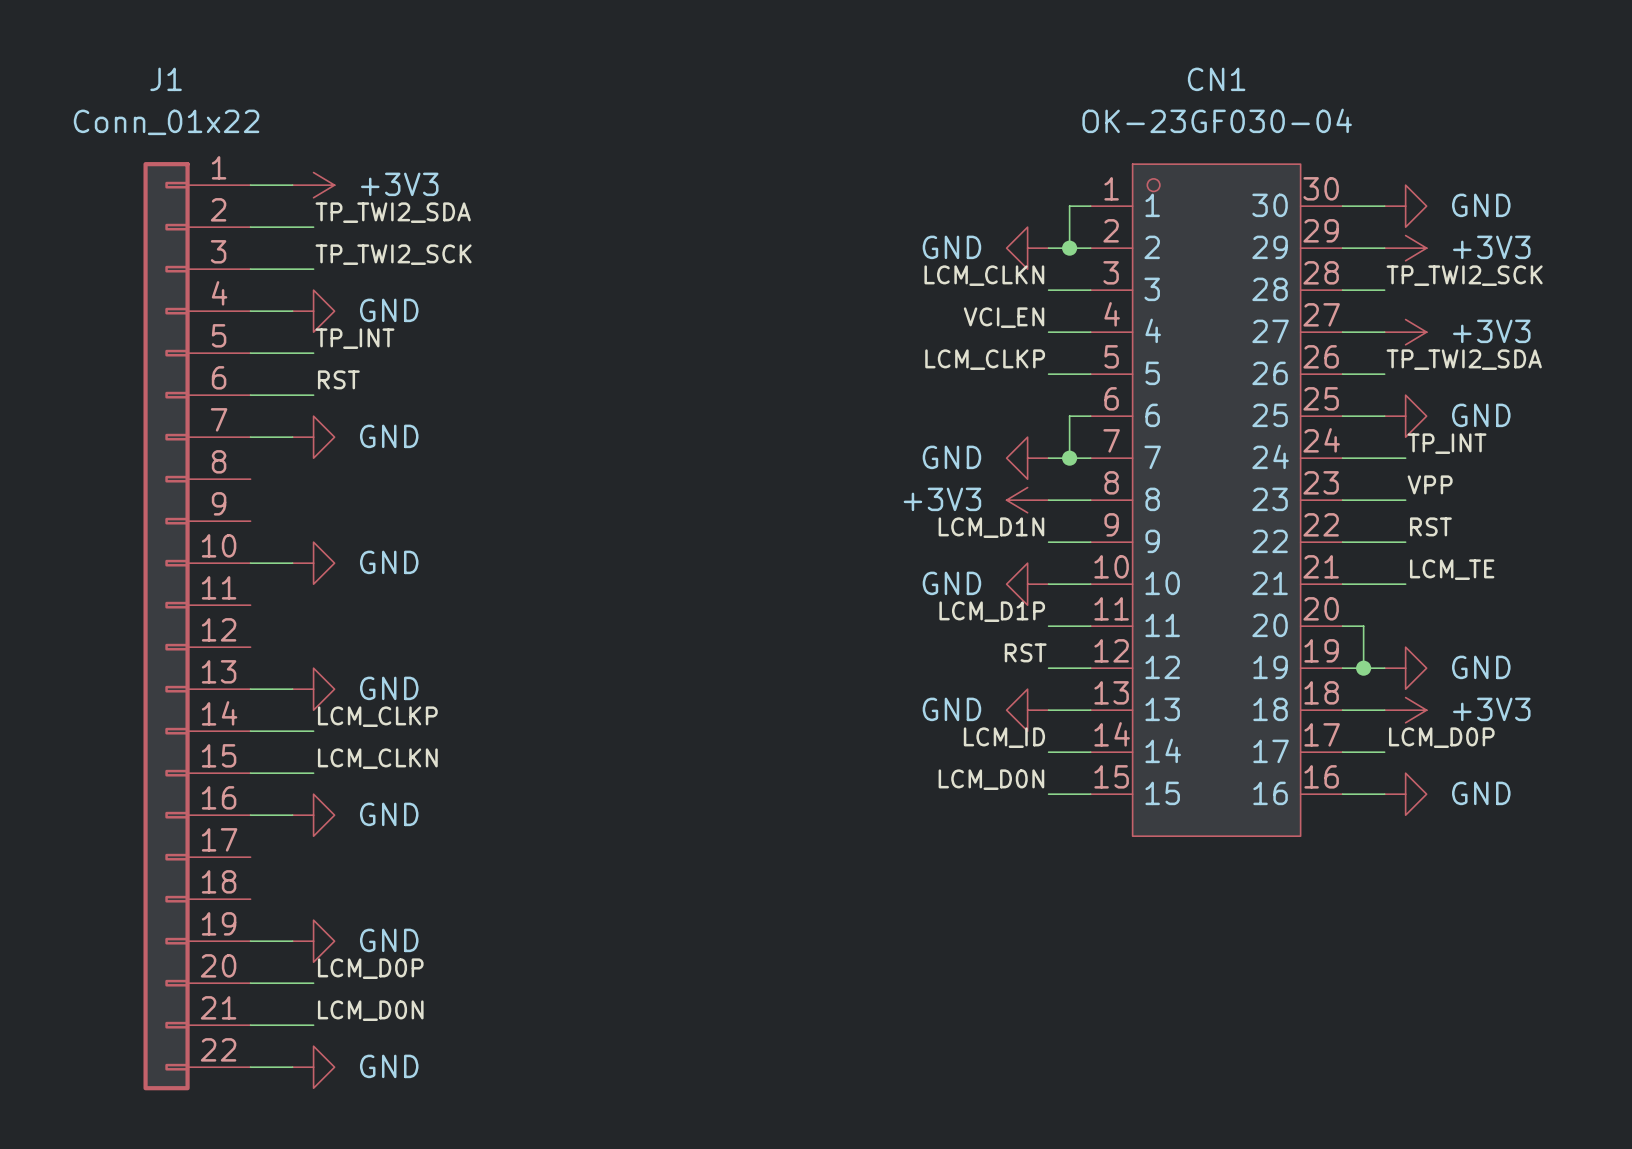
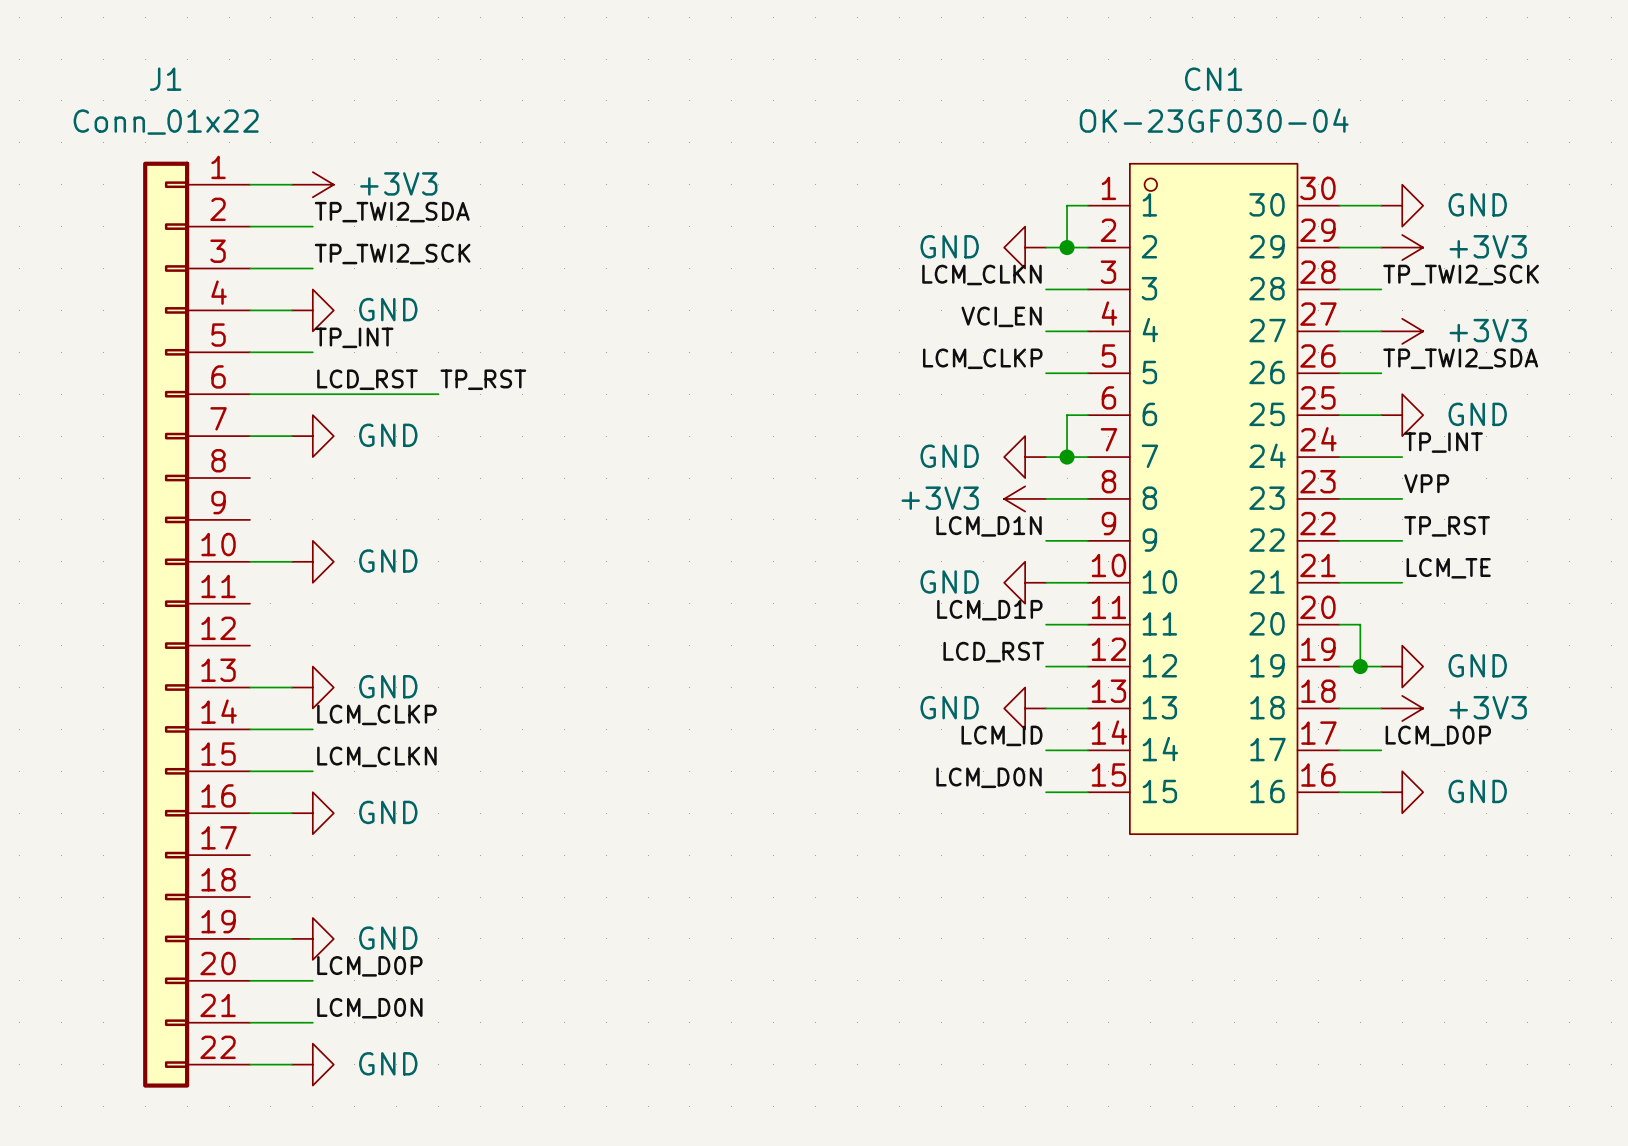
label: RST (338, 379) -> LCD_RST (367, 379)
label: none -> TP_RST (483, 379)
wire: none -> (312, 394) (438, 394)
label: RST (1430, 526) -> TP_RST (1447, 526)
label: RST (1025, 652) -> LCD_RST (993, 652)

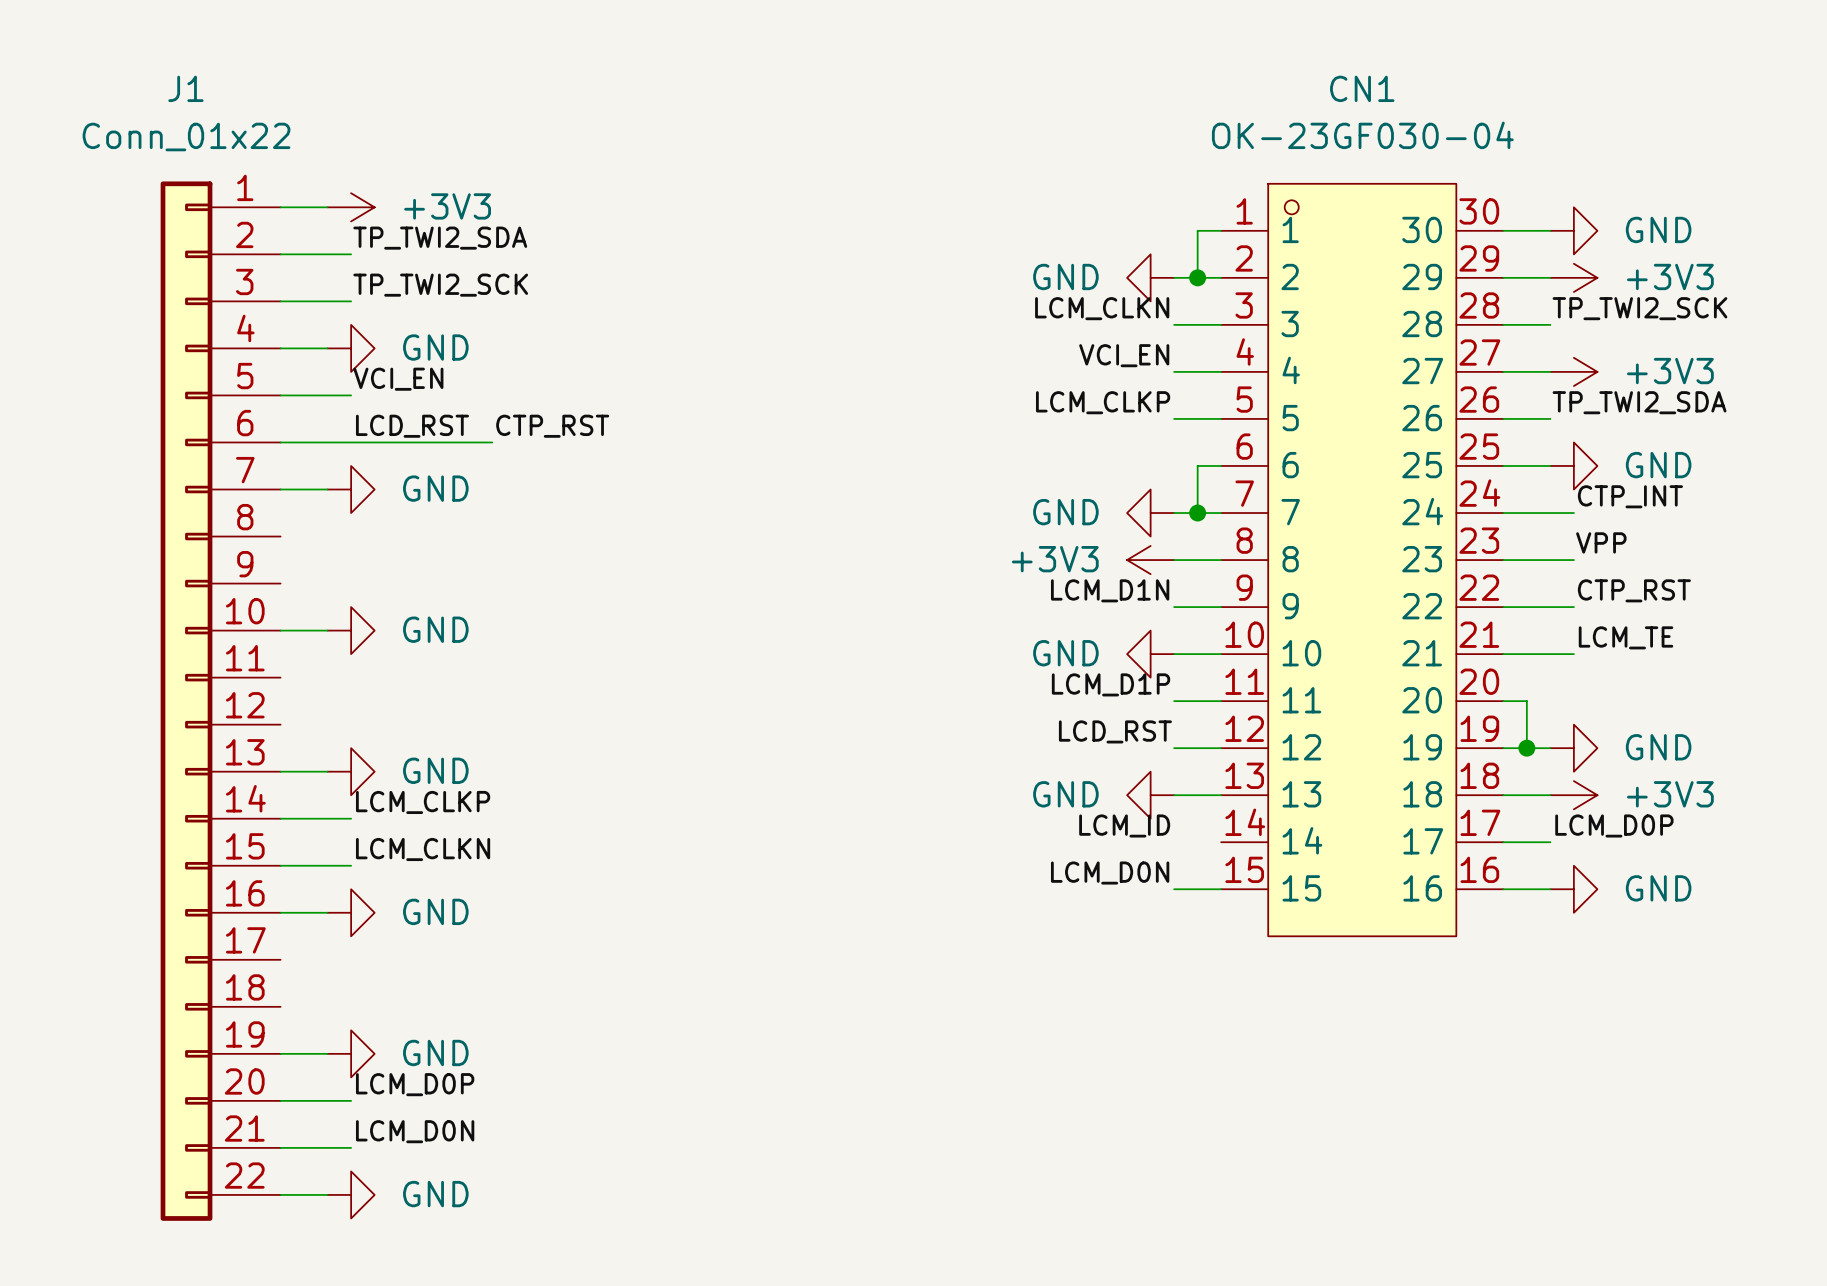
label: TP_INT (354, 337) -> VCI_EN (398, 379)
label: TP_RST (483, 379) -> CTP_RST (552, 426)
label: TP_INT (1443, 442) -> CTP_INT (1630, 496)
label: TP_RST (1447, 526) -> CTP_RST (1634, 590)
wire: (1046, 750) (1087, 750) -> none

